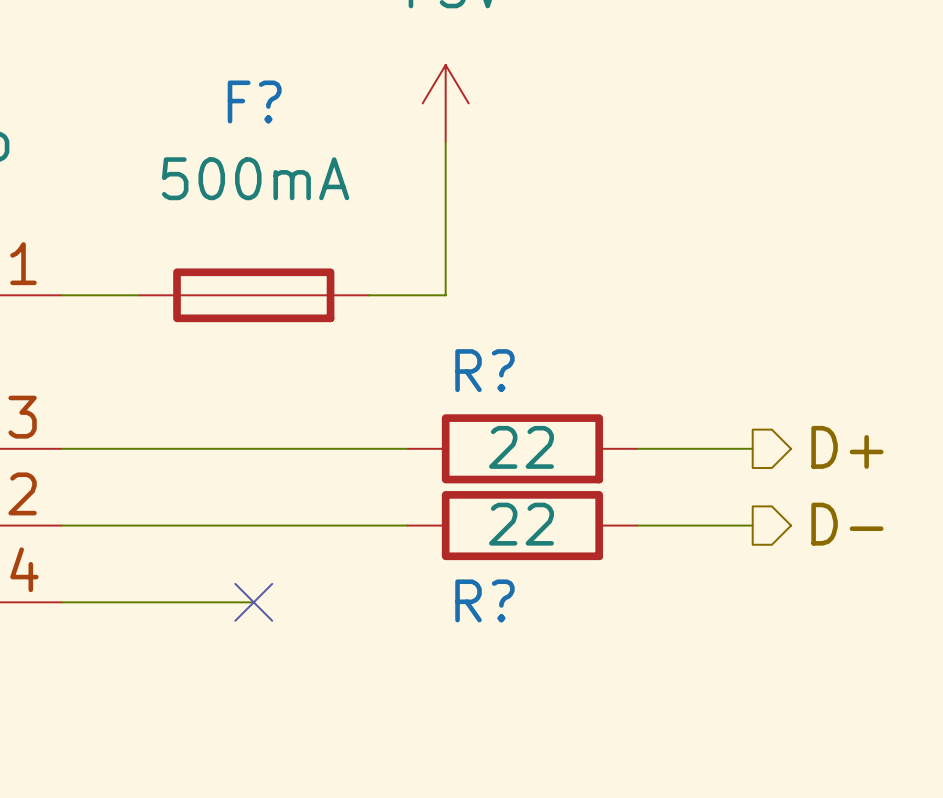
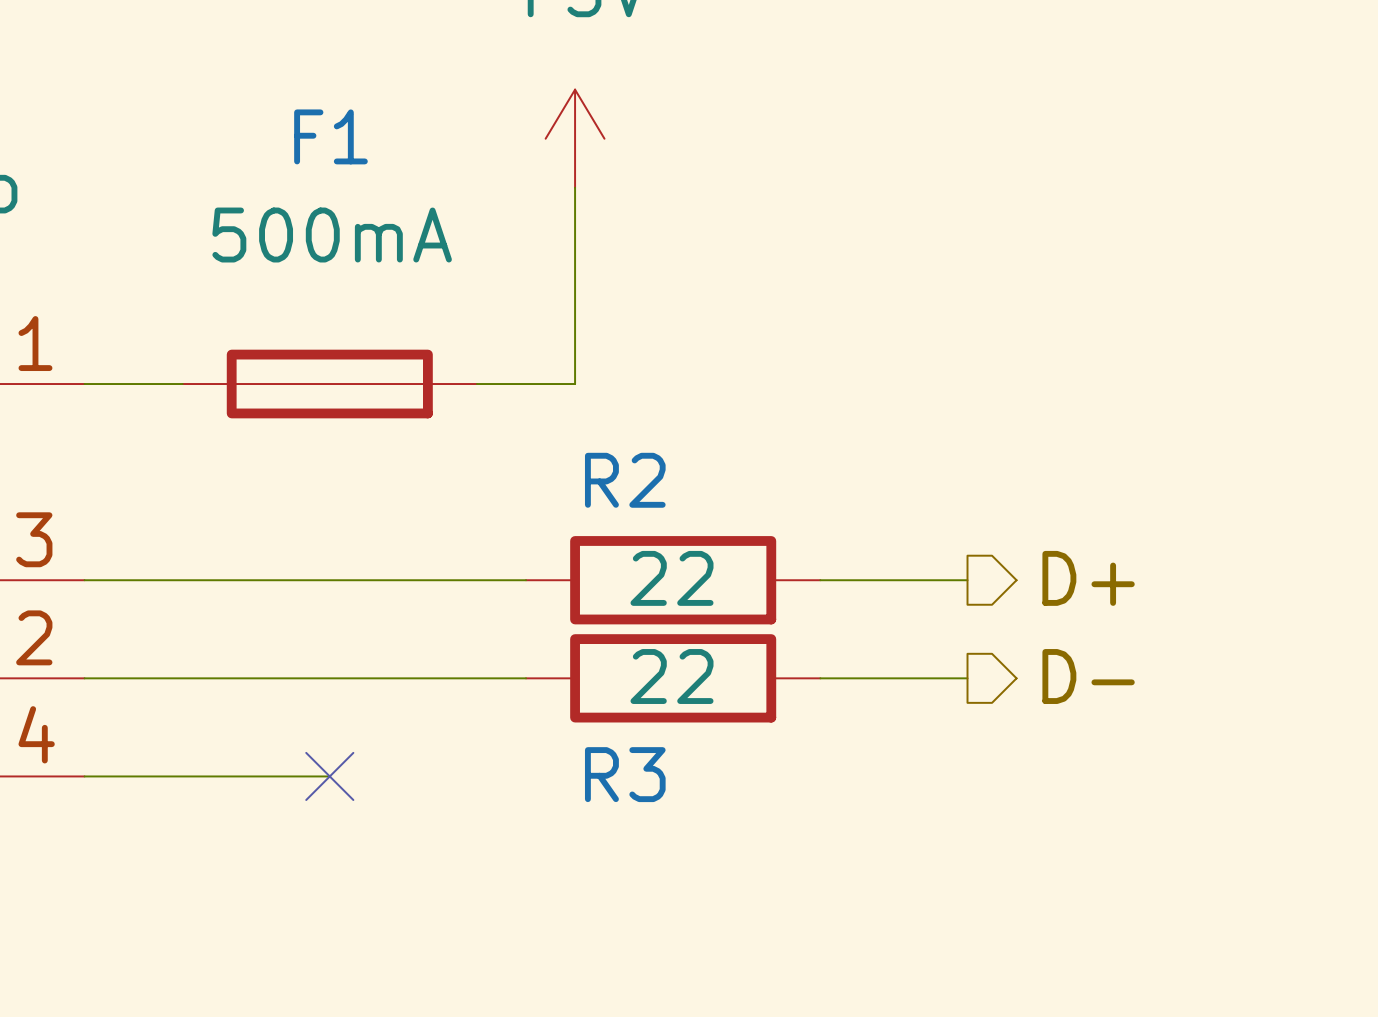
F? name: F? (254, 101) -> F1 (330, 136)
R? name: R? (484, 370) -> R2 (625, 480)
R? name: R? (484, 600) -> R3 (625, 774)

